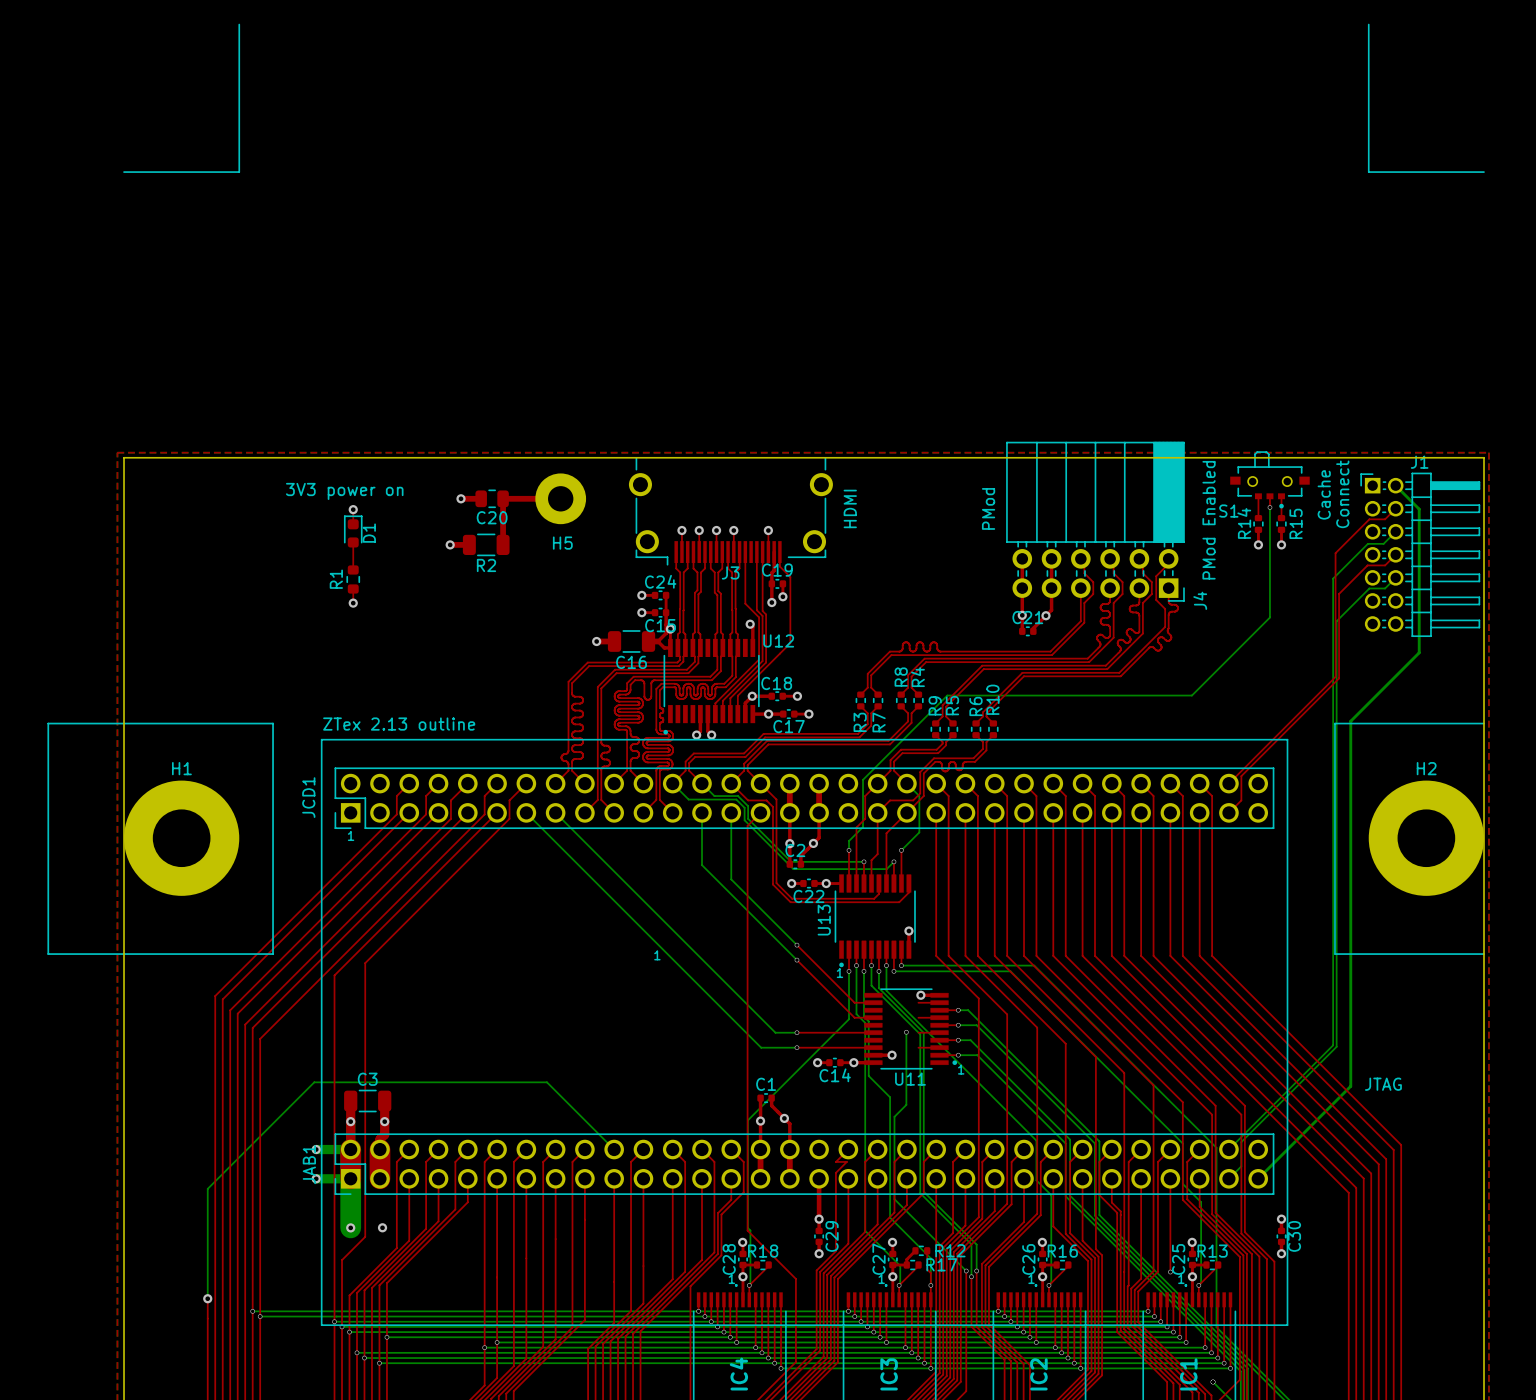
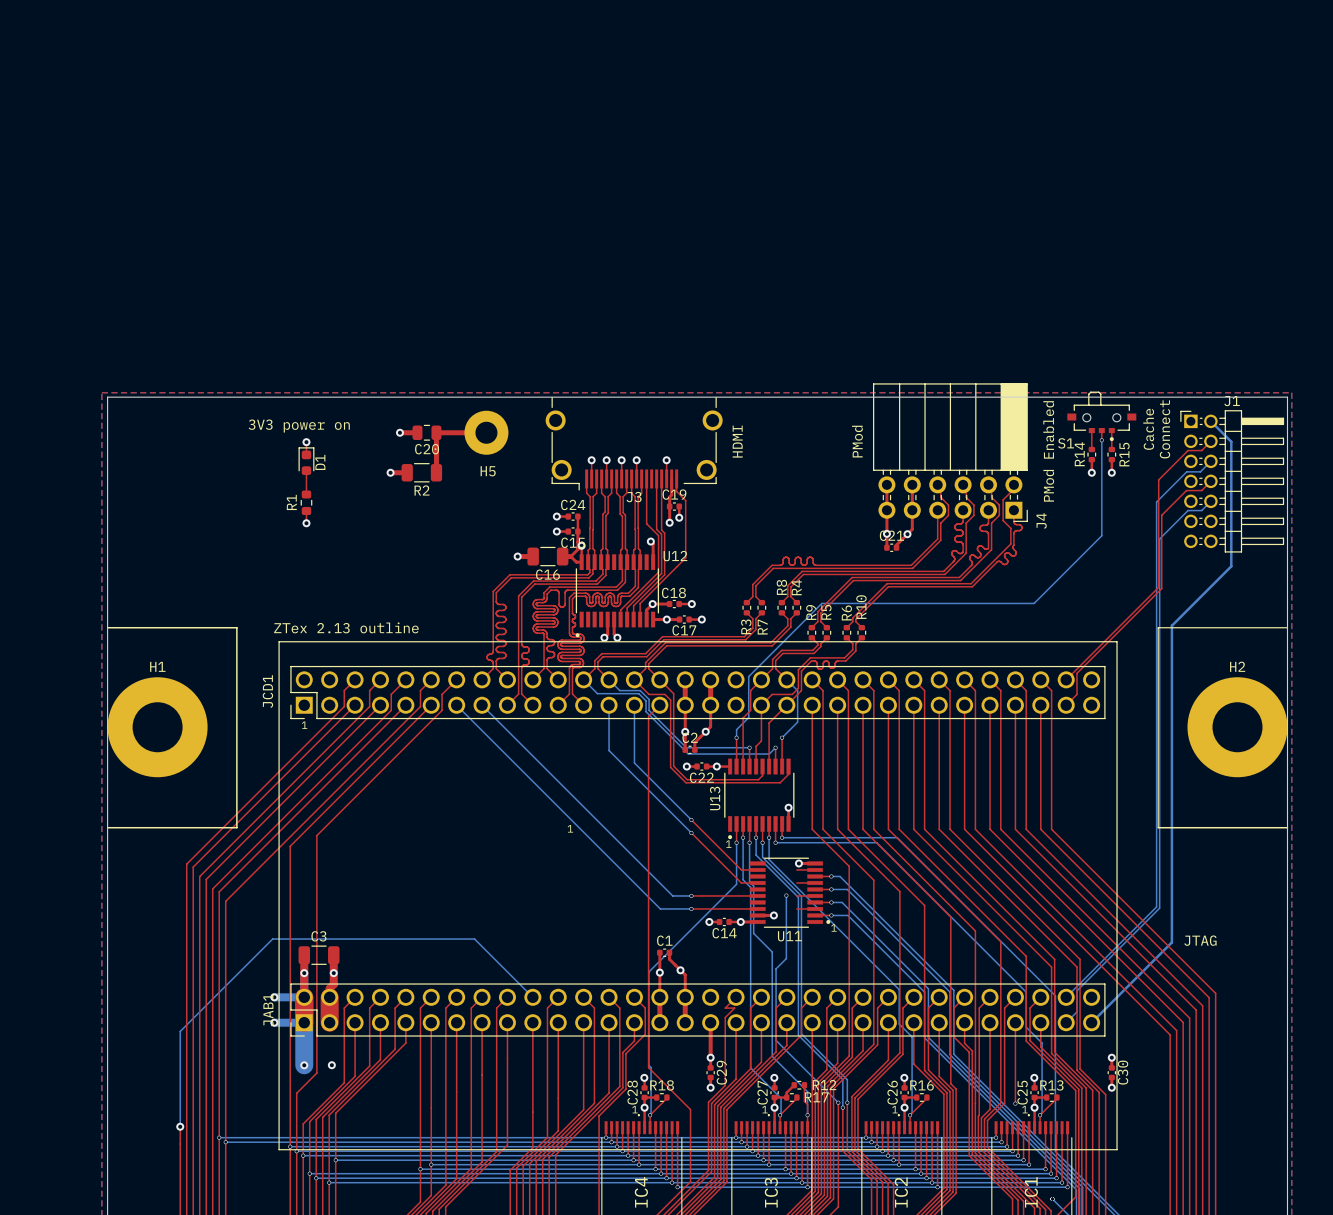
line: (239, 24) (239, 172) (124, 172) -> none
line: (1368, 24) (1368, 172) (1484, 172) -> none
line: (124, 723) (48, 723) (48, 954) (124, 954) -> none

